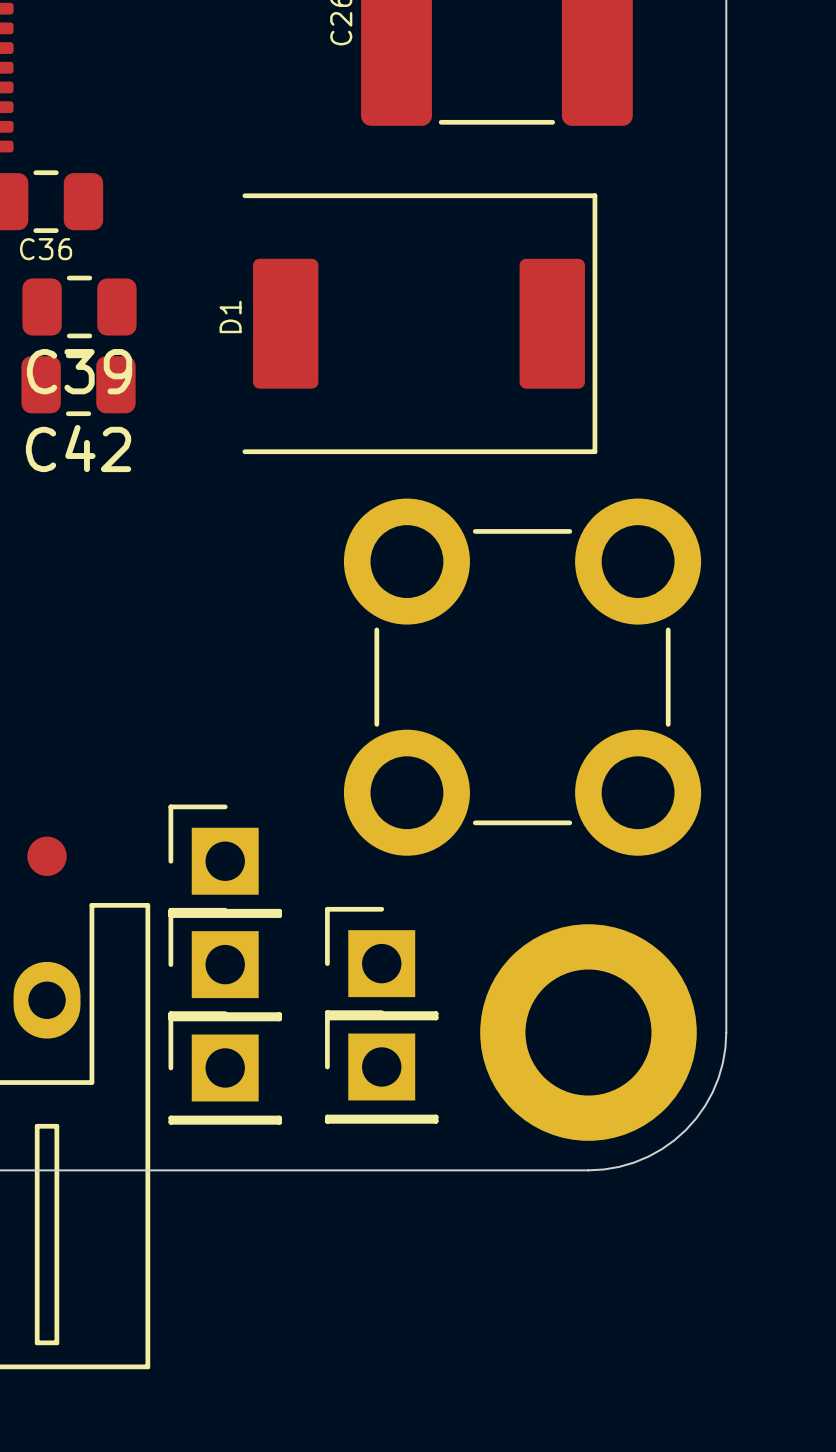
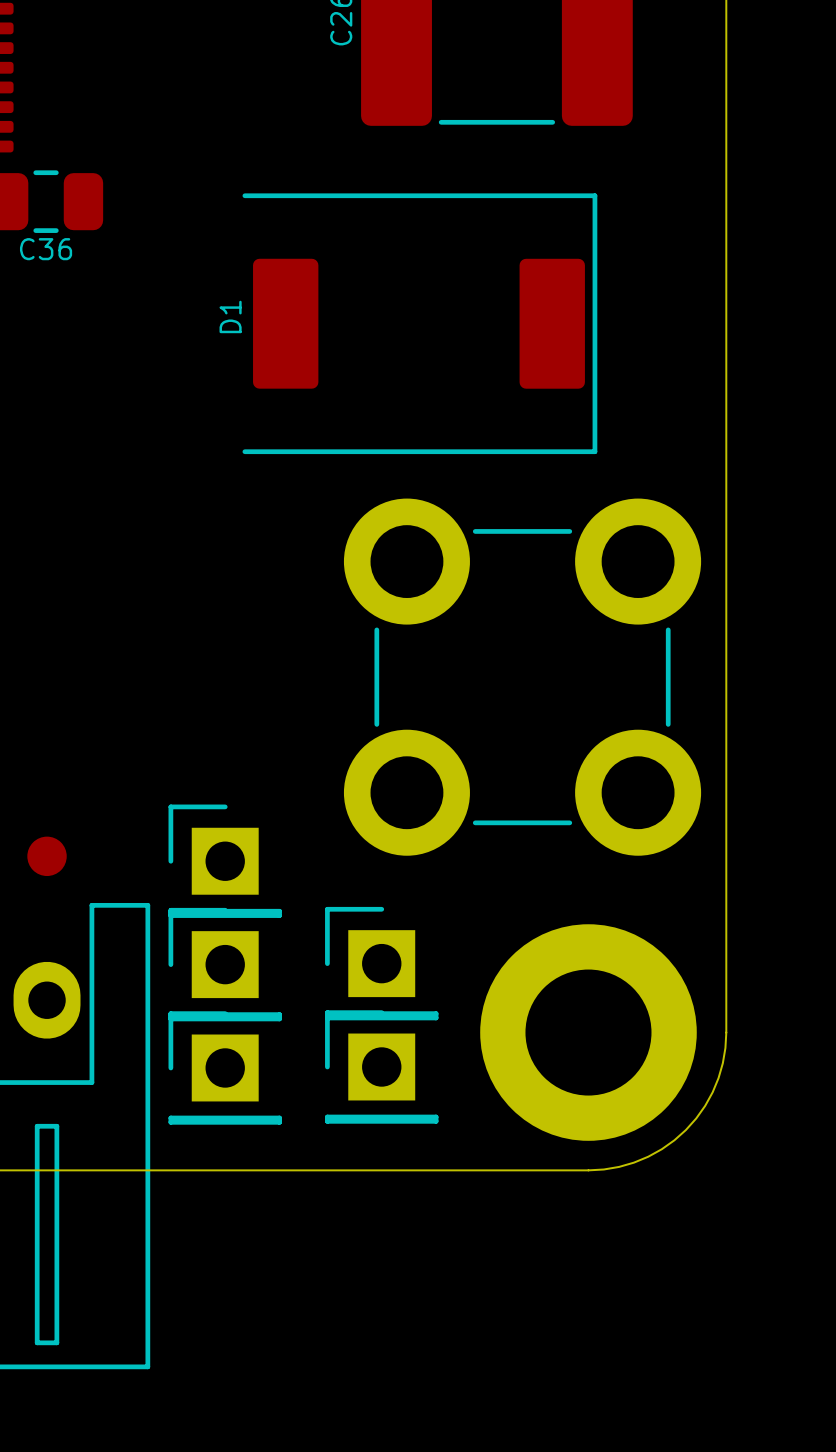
C39: (79, 306) -> none
C42: (78, 384) -> none

